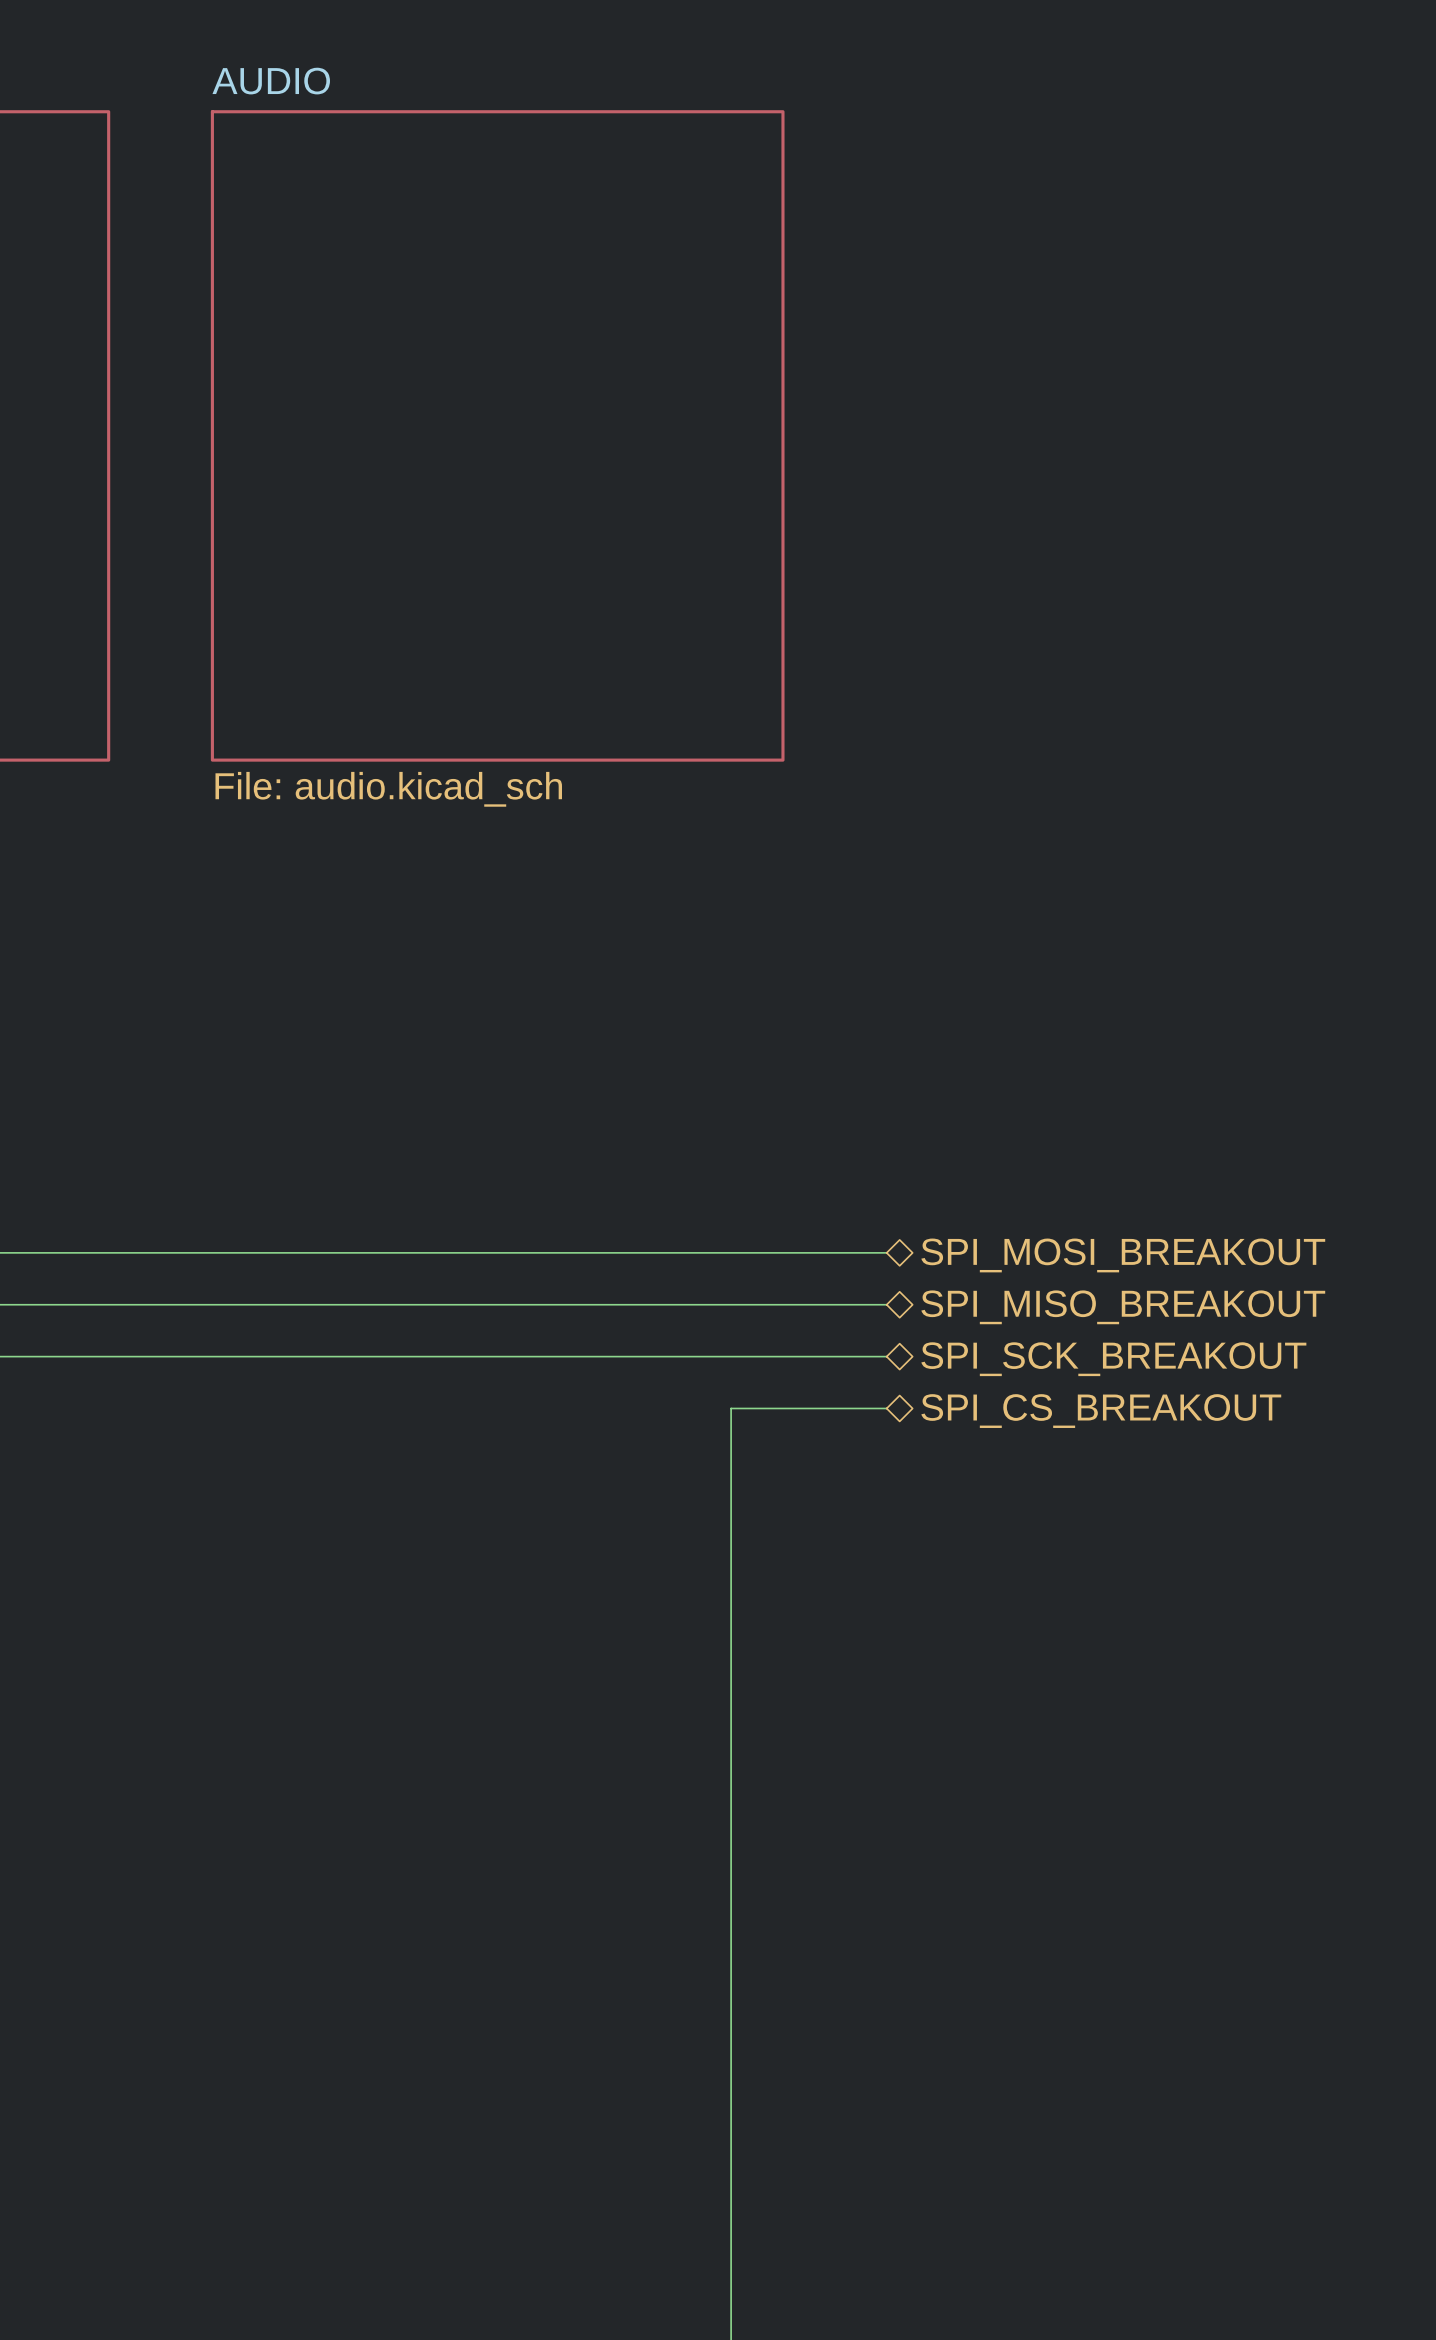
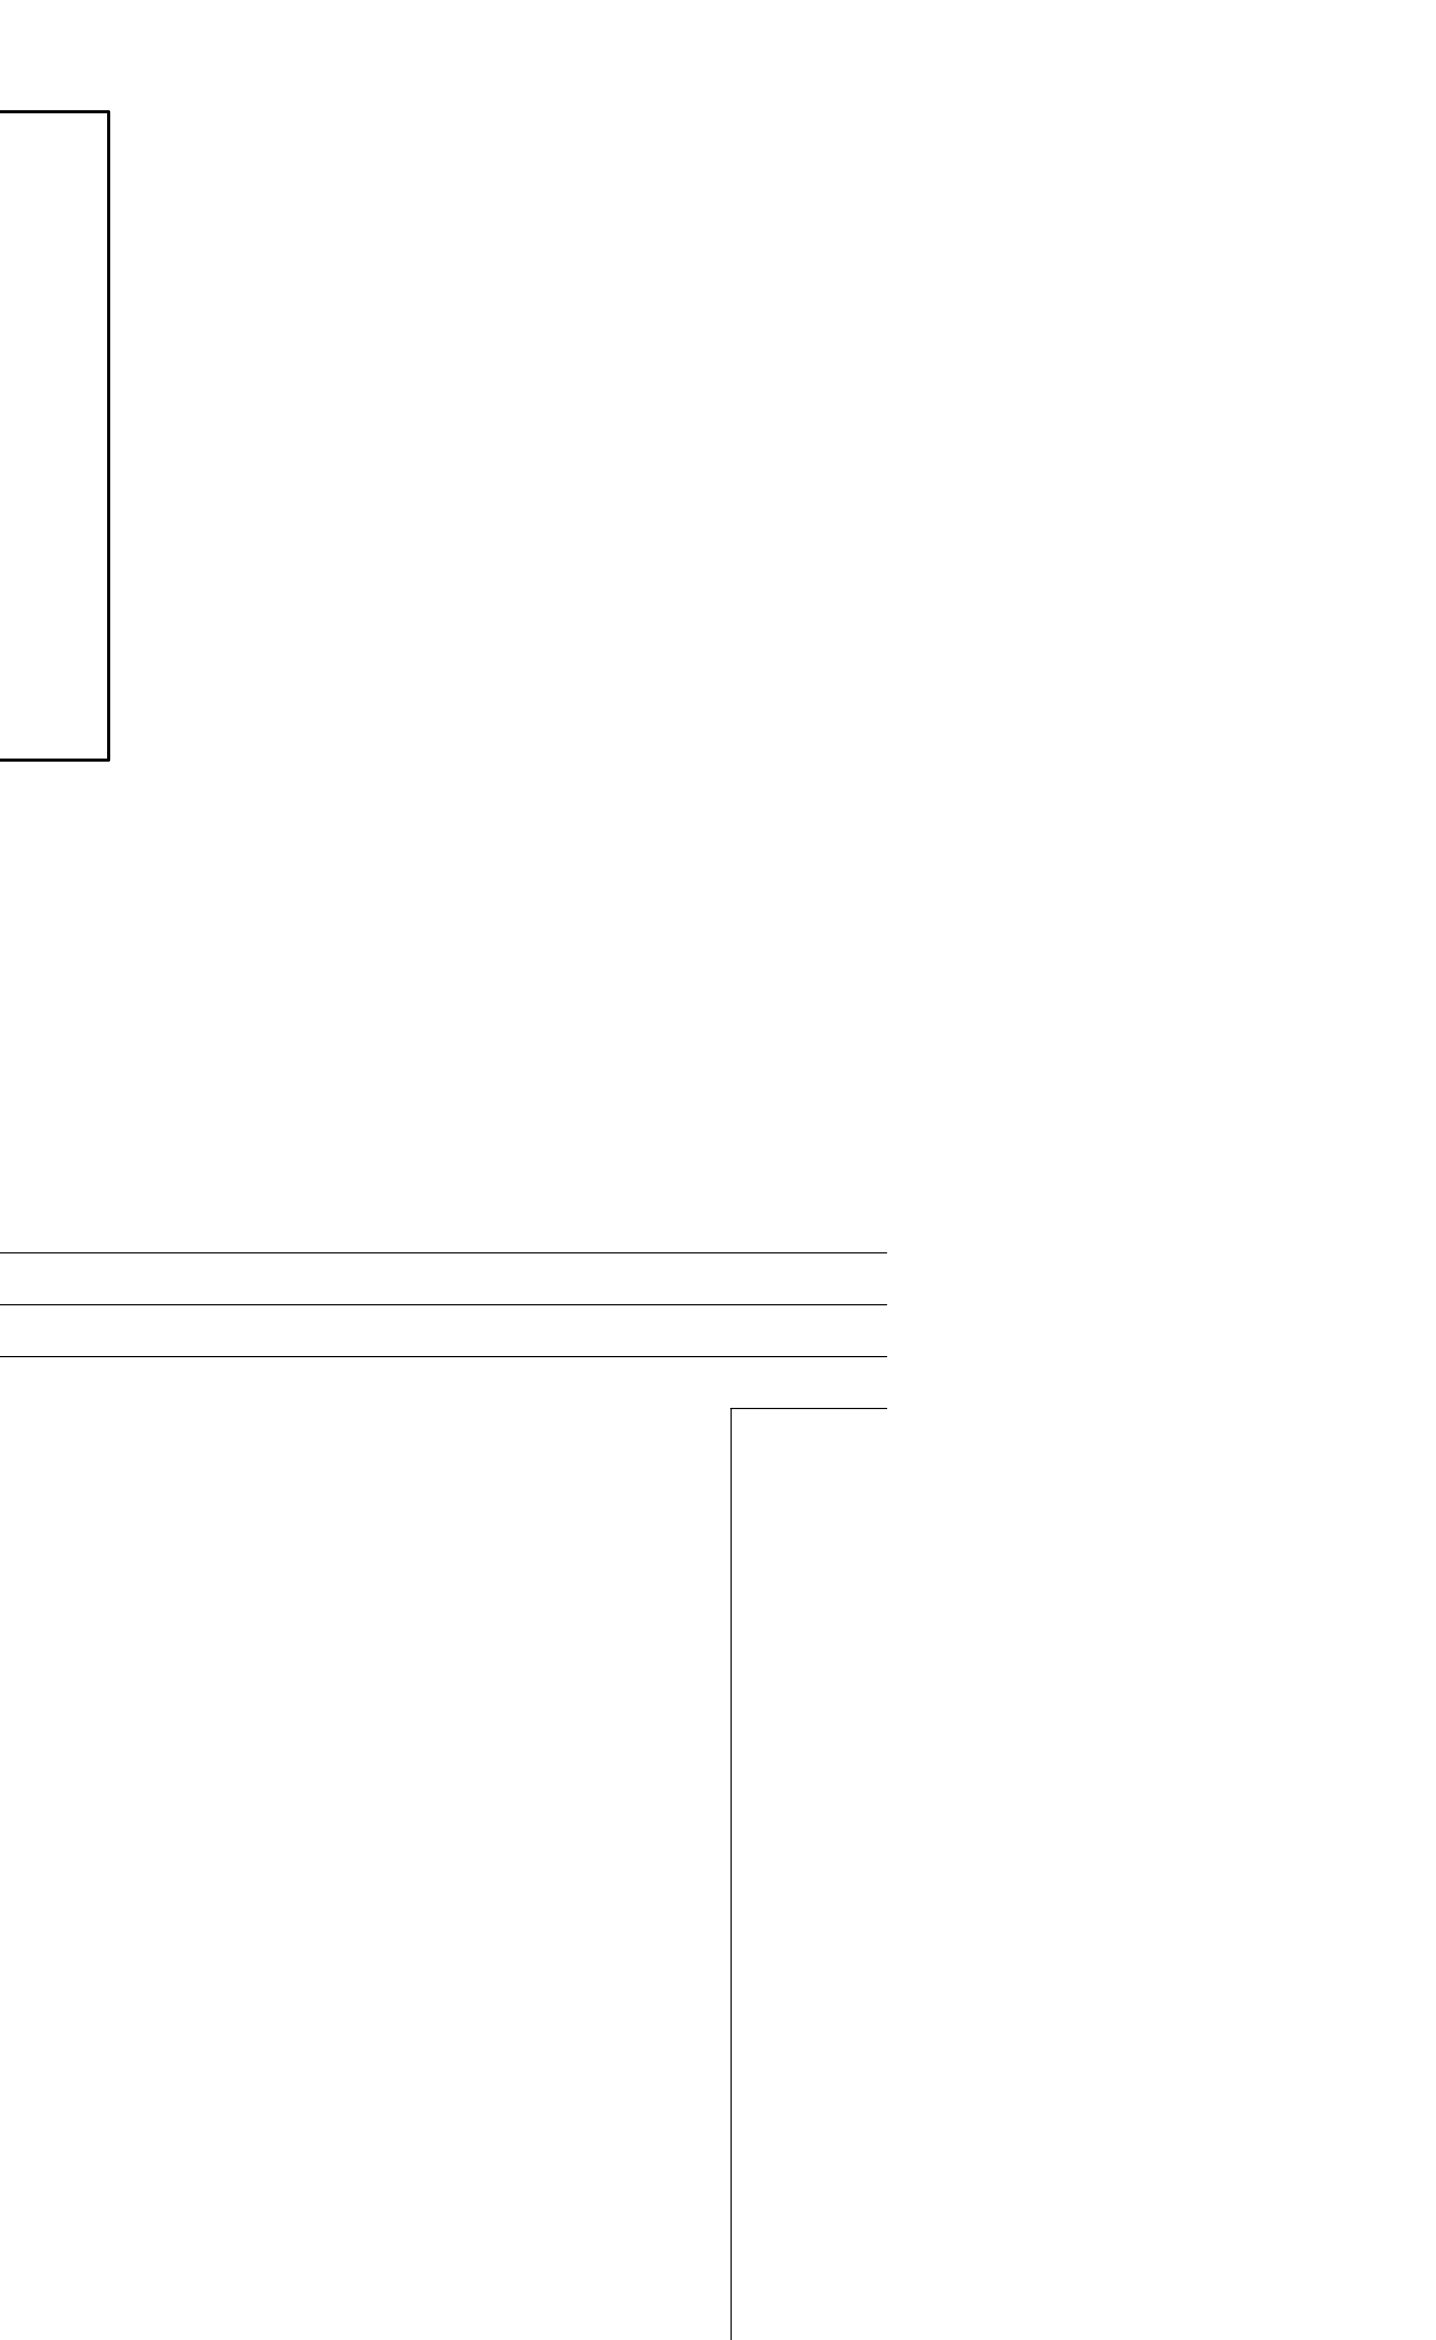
sheet AUDIO: File: audio.kicad_sch (497, 435) -> none
hierarchical label: SPI_MOSI_BREAKOUT (1123, 1255) -> none
hierarchical label: SPI_MISO_BREAKOUT (1123, 1307) -> none
hierarchical label: SPI_SCK_BREAKOUT (1113, 1359) -> none
hierarchical label: SPI_CS_BREAKOUT (1101, 1411) -> none

